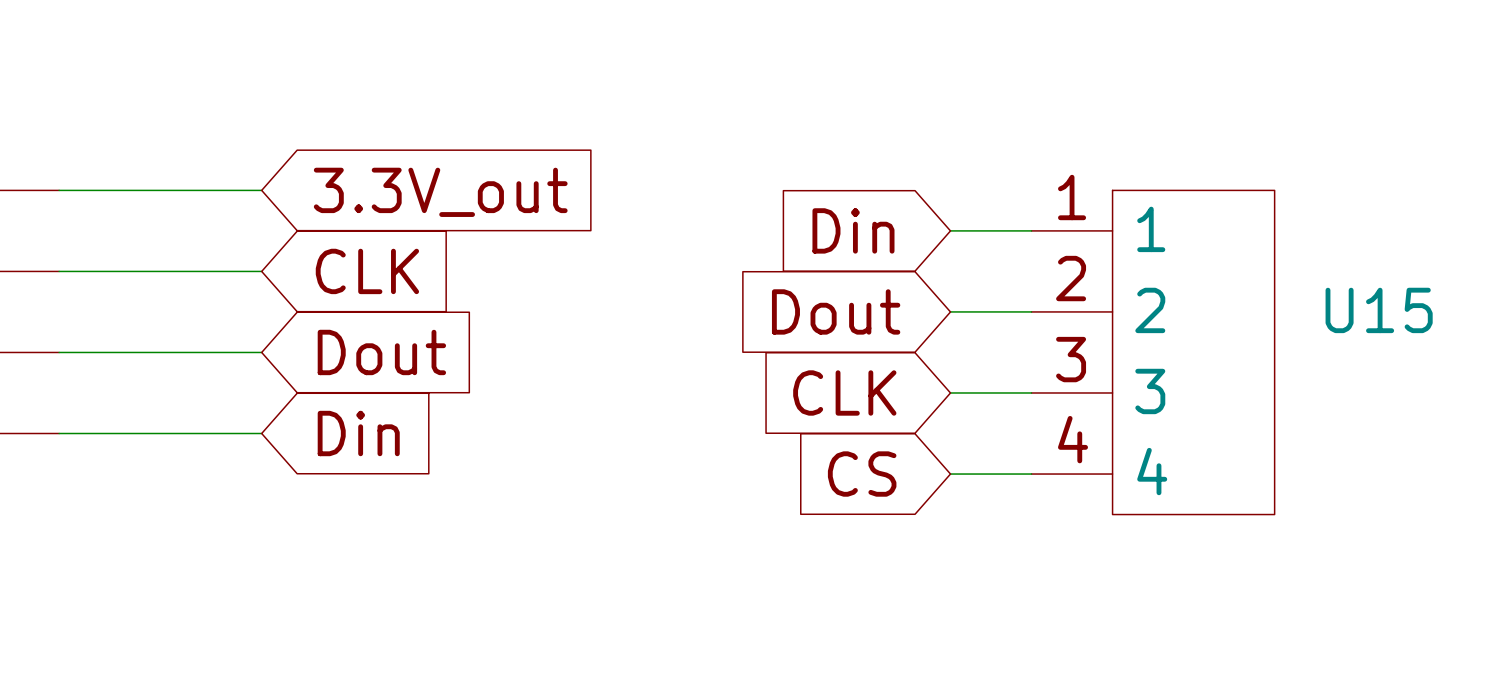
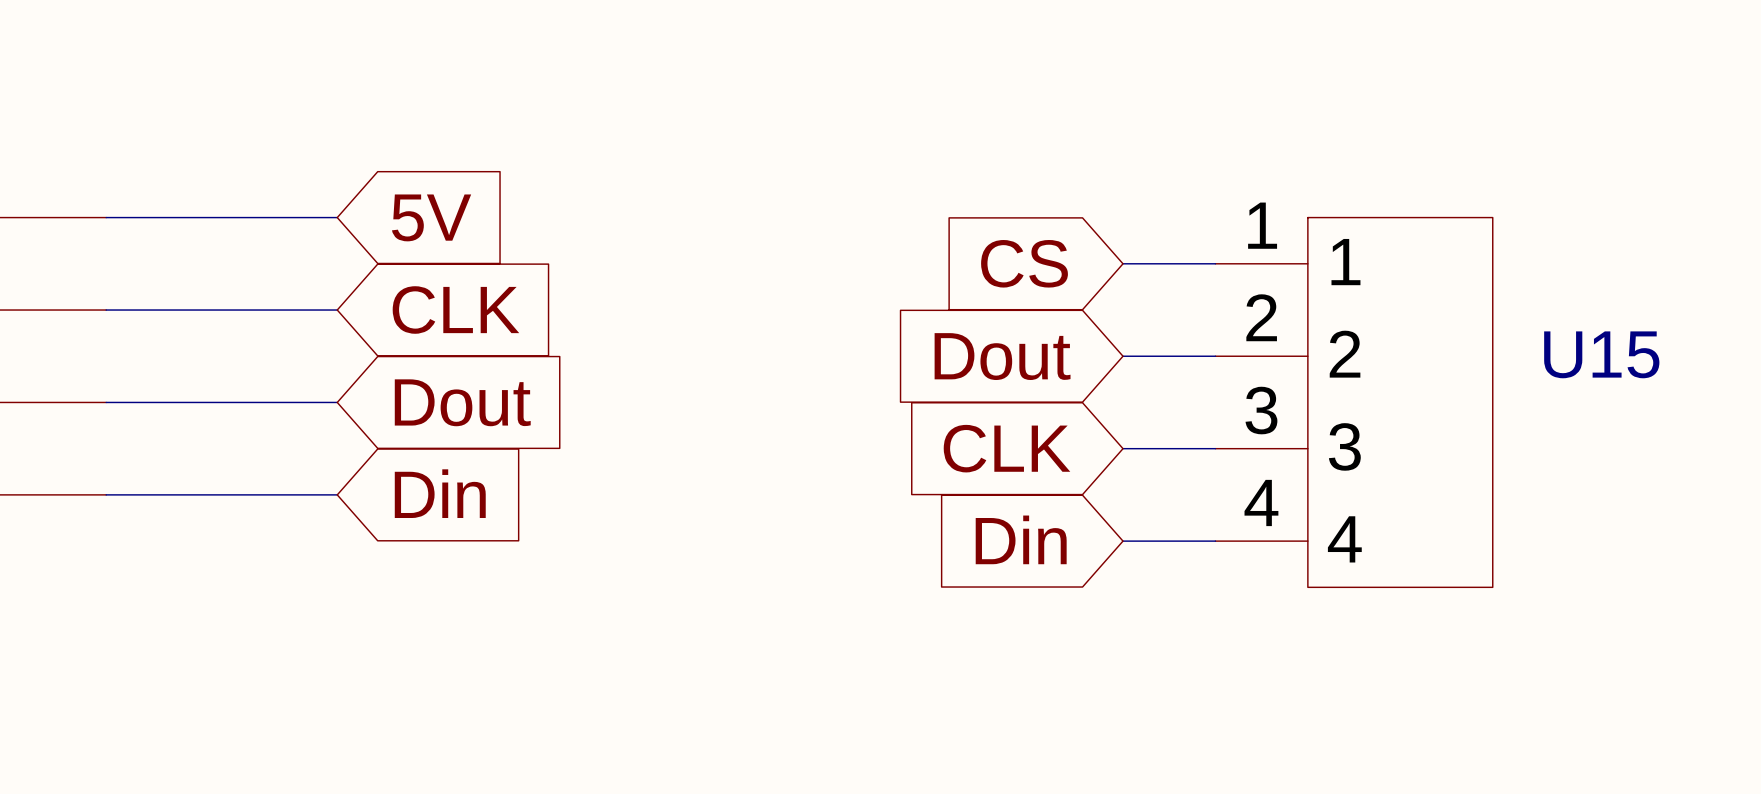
global label: 3.3V_out (440, 192) -> 5V (431, 217)
global label: Din (853, 230) -> CS (1024, 263)
global label: CS (862, 474) -> Din (1021, 539)

